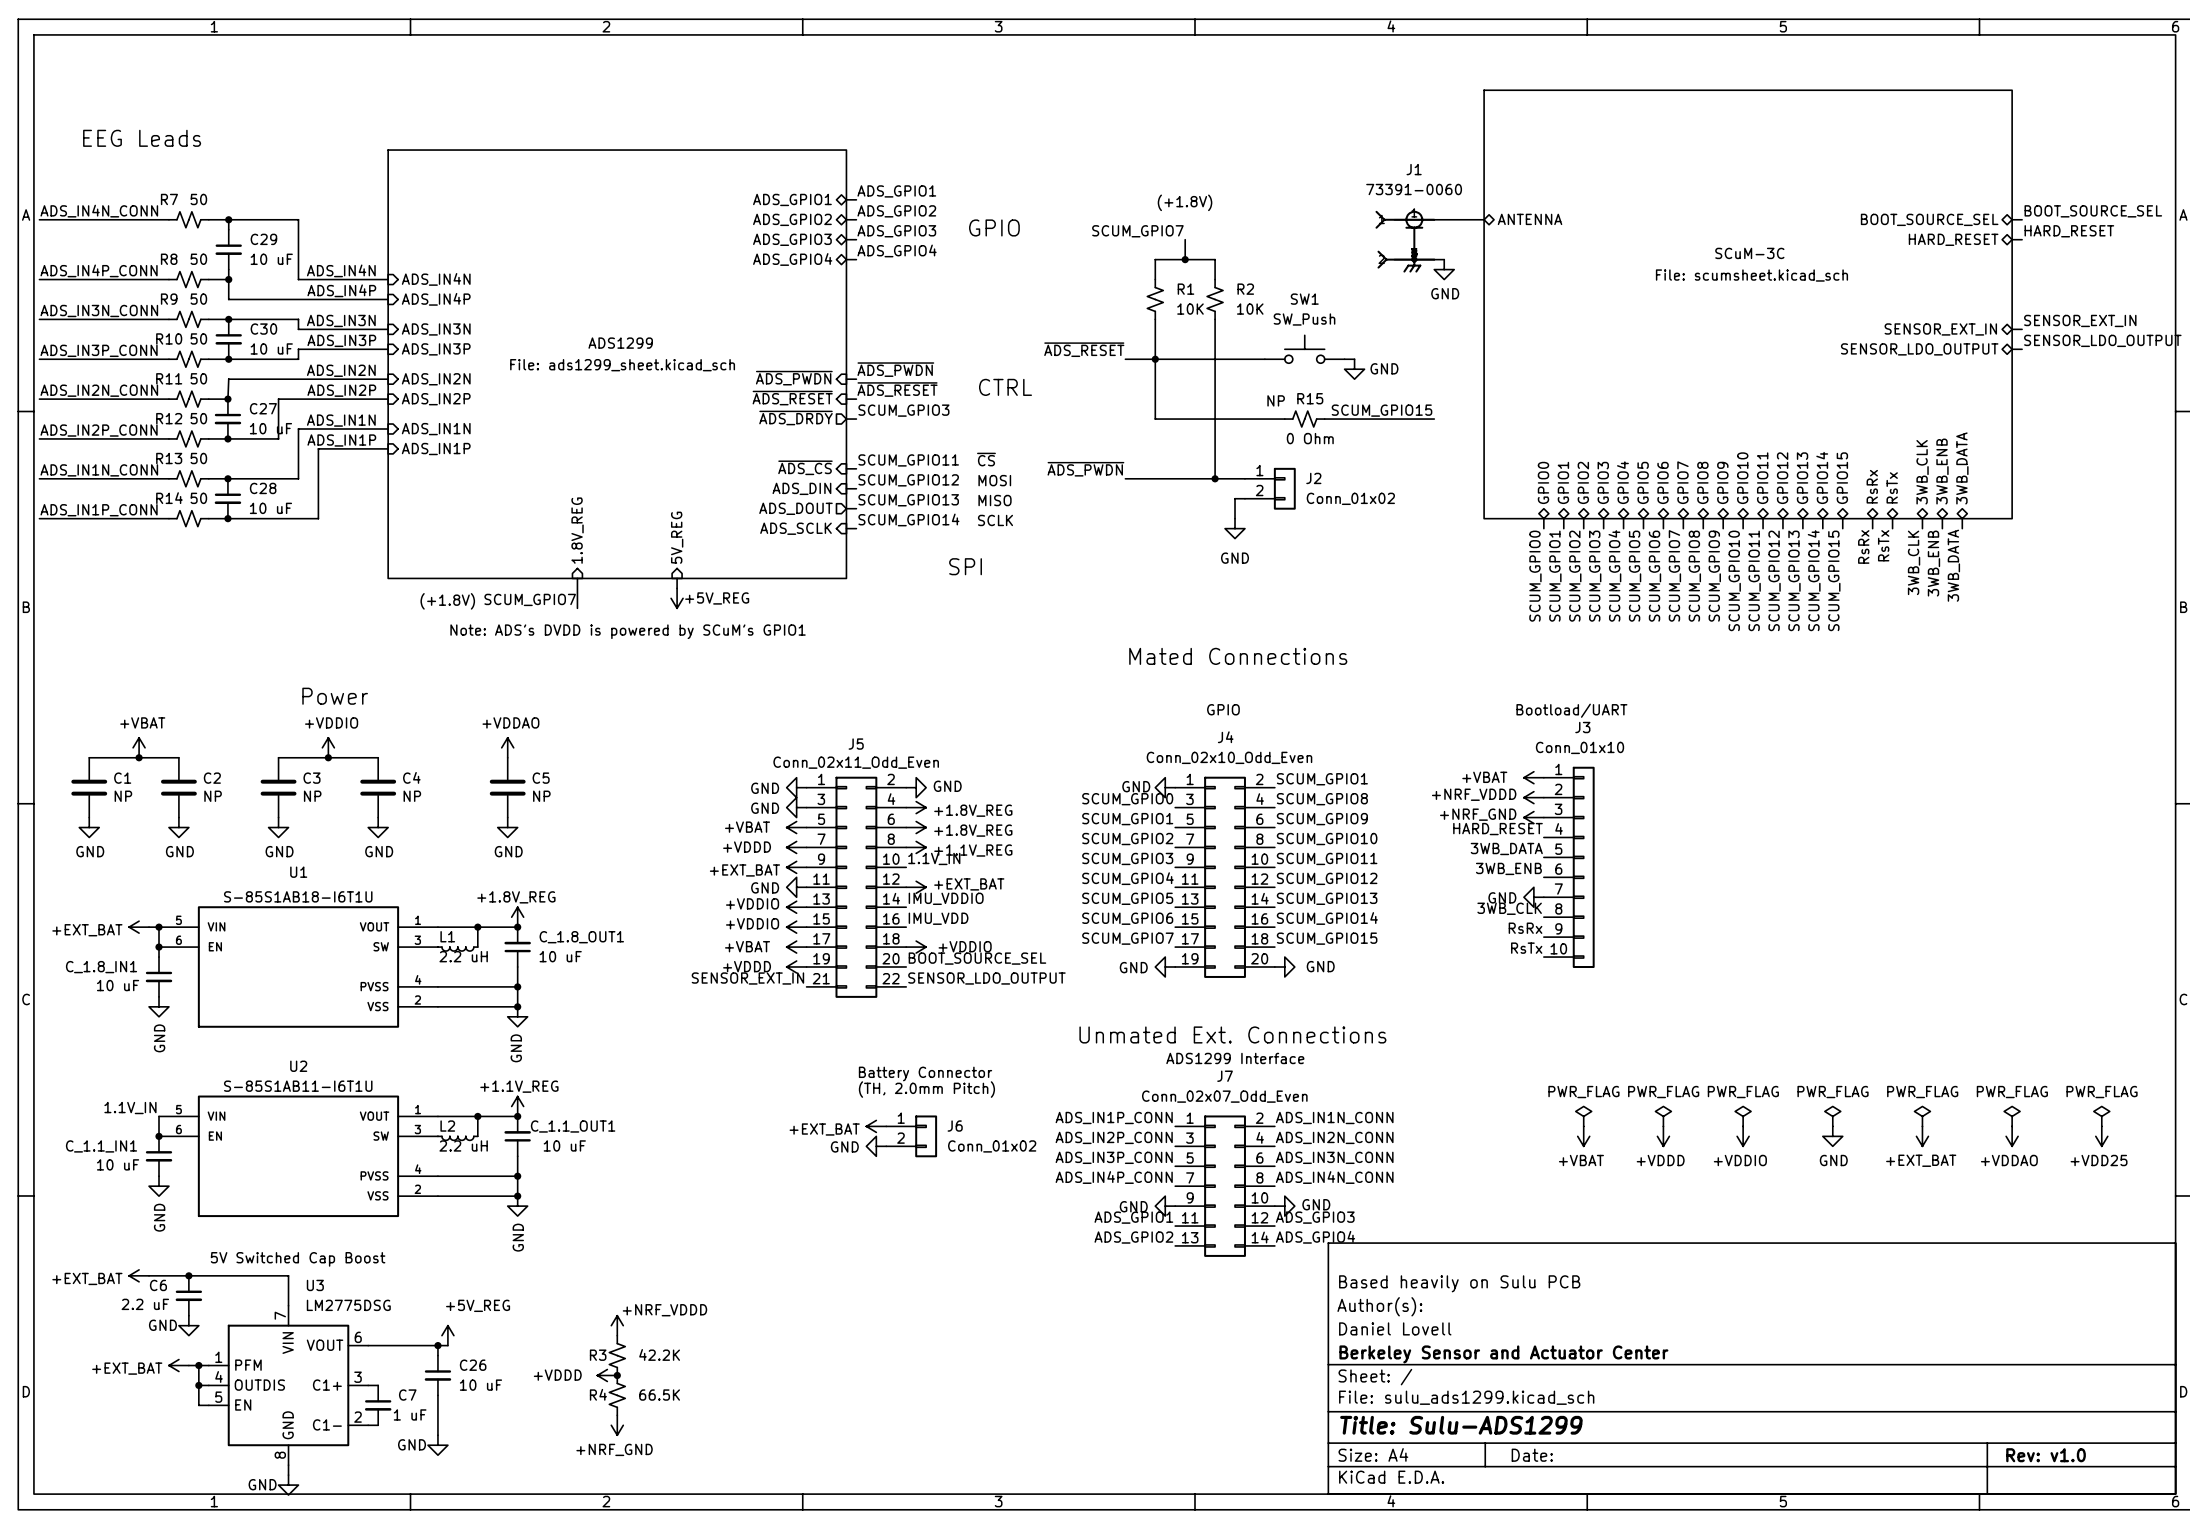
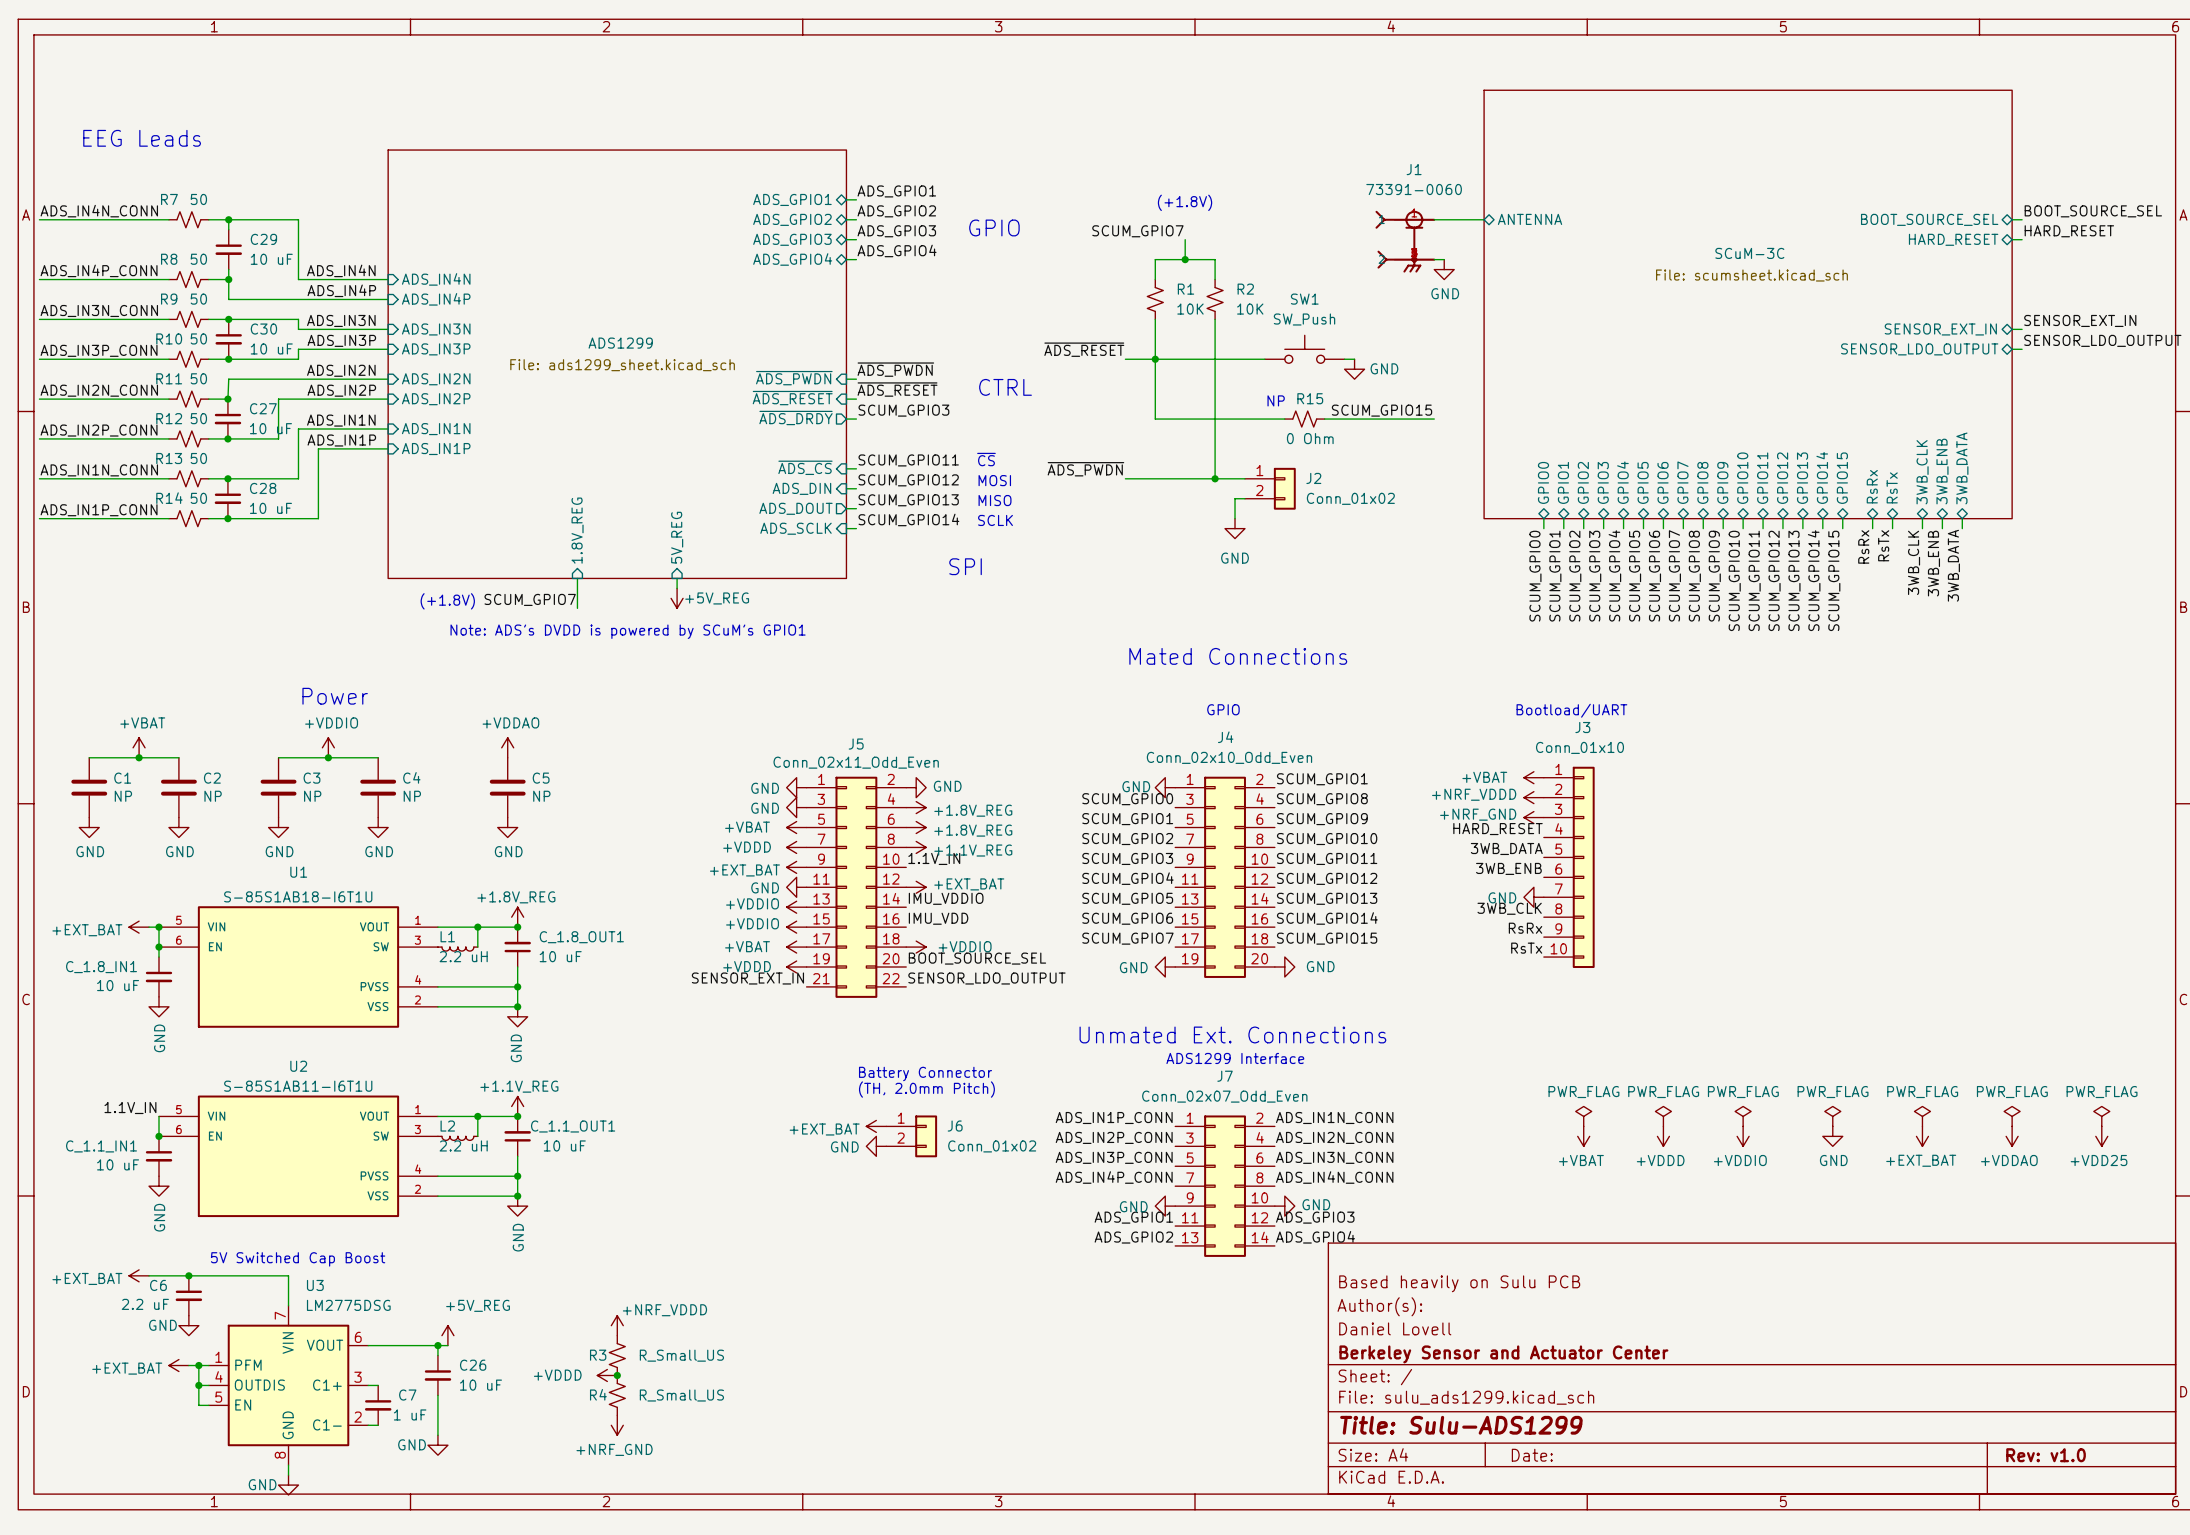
R3 value: 42.2K (659, 1354) -> R_Small_US (681, 1355)
R4 value: 66.5K (659, 1395) -> R_Small_US (681, 1395)

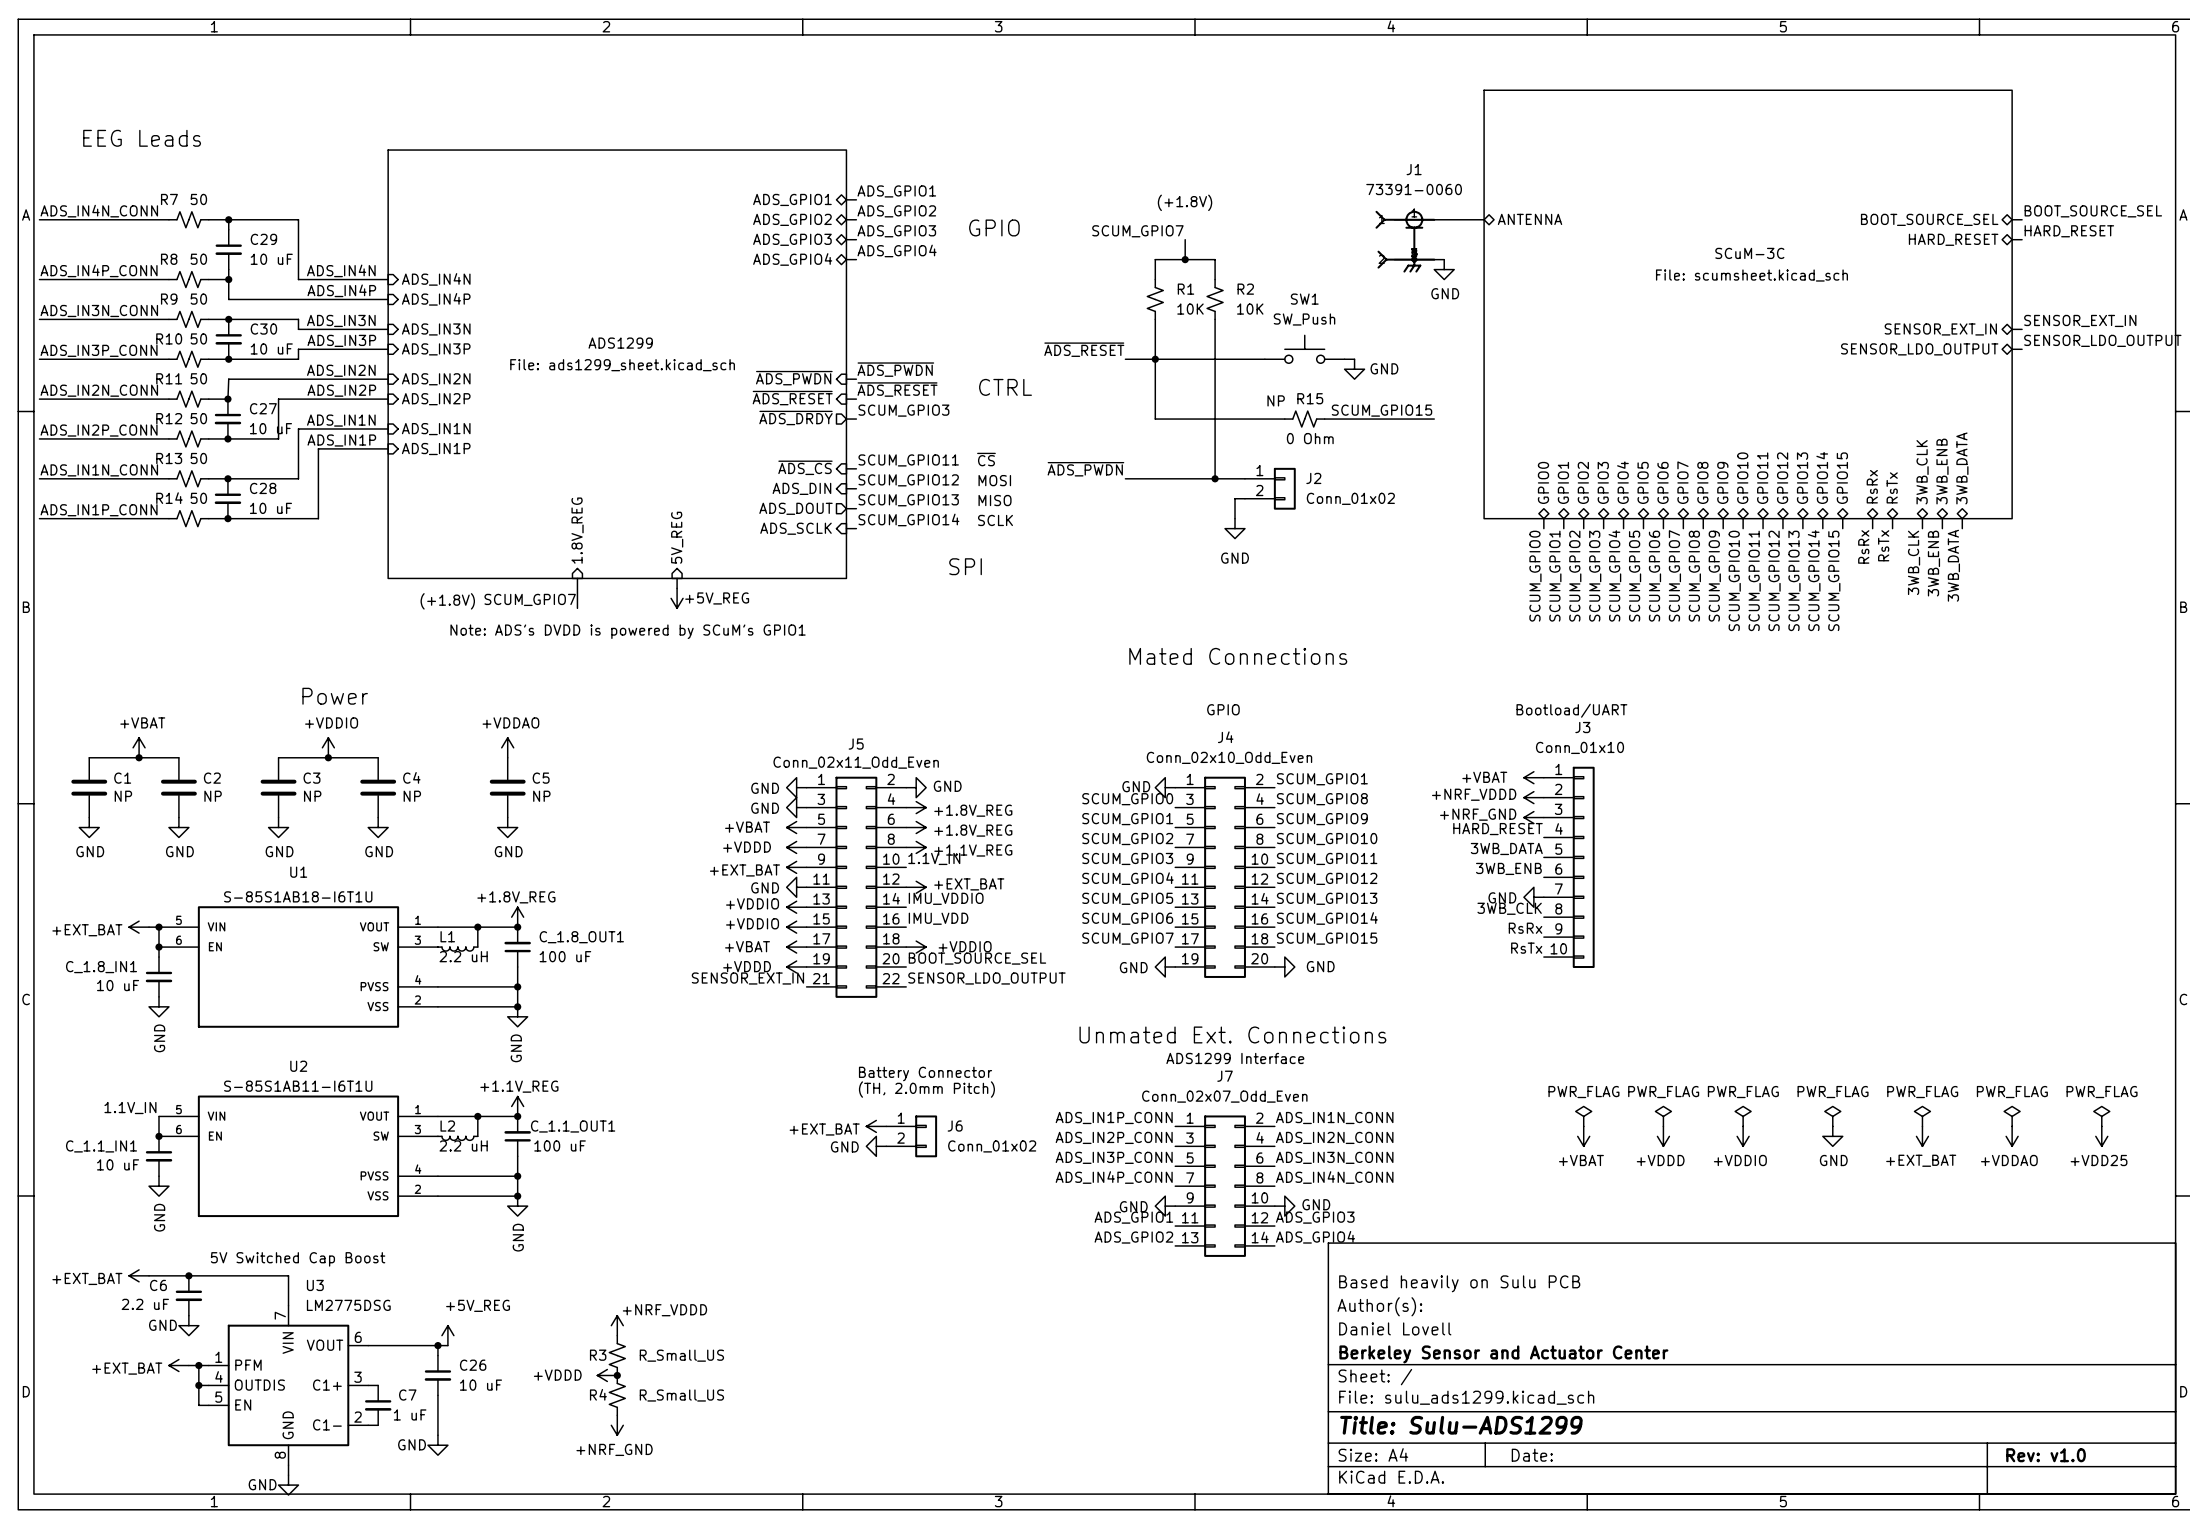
C_1.8_OUT1 value: 10 uF (560, 956) -> 100 uF (565, 956)
C_1.1_OUT1 value: 10 uF (564, 1145) -> 100 uF (560, 1145)

